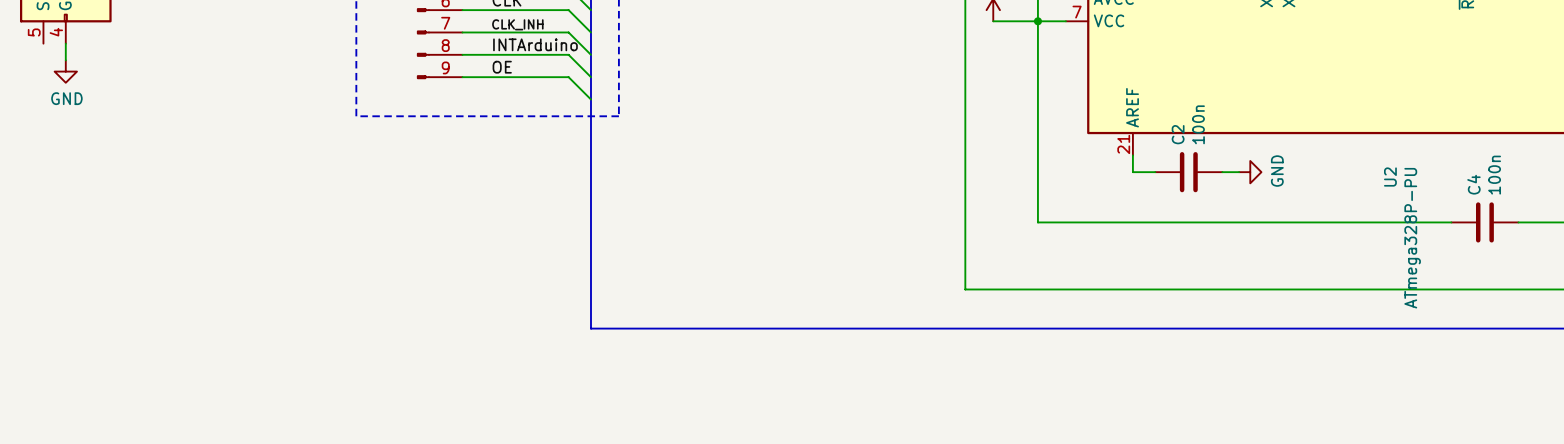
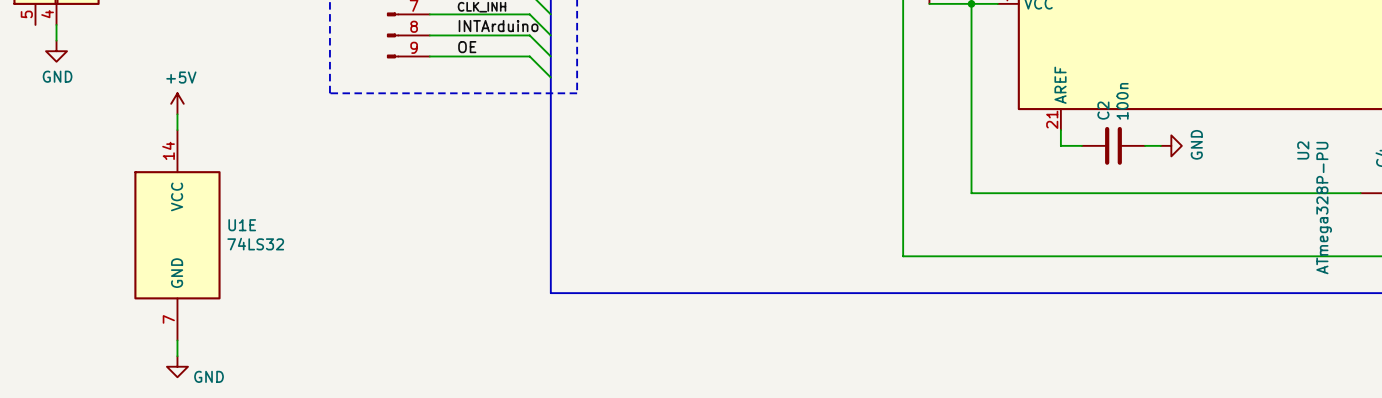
power symbol: none -> +5V (177, 103)
wire: none -> (177, 114) (177, 130)
U1E: none -> 74LS32 (177, 235)
wire: none -> (177, 340) (177, 356)
power symbol: none -> GND (177, 366)

